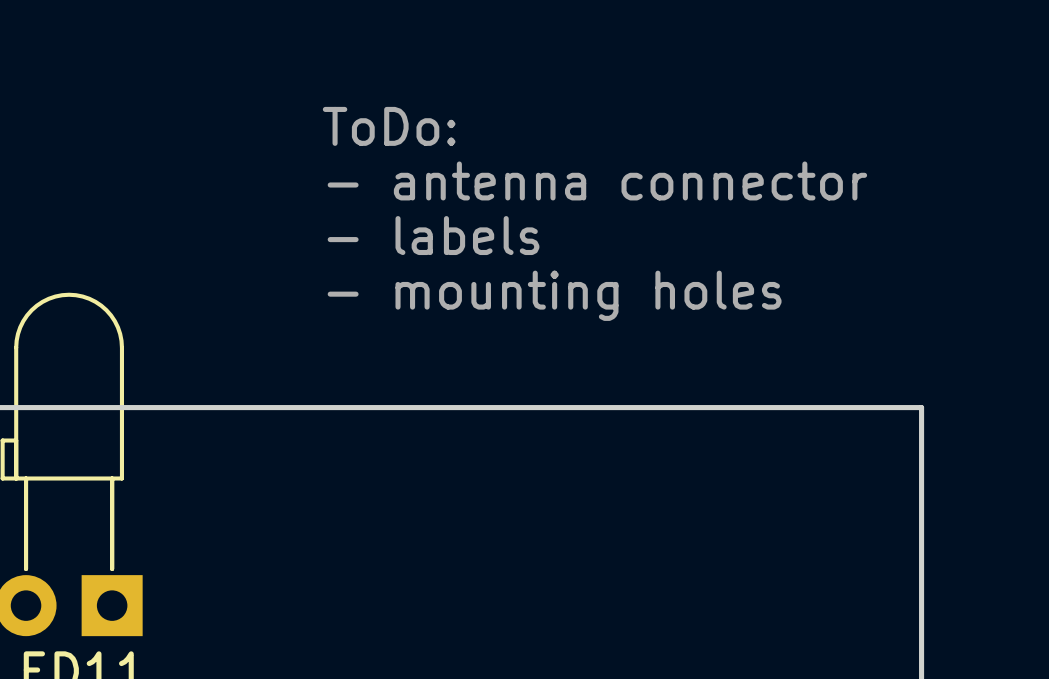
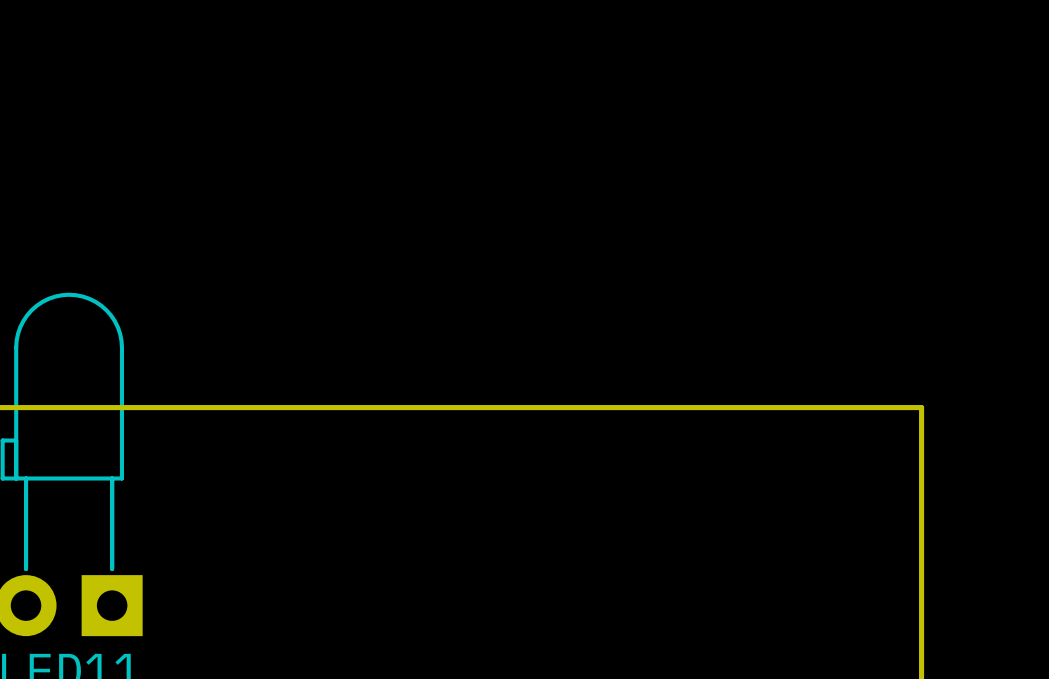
text: ToDo: (389, 126) -> none
text: - antenna connector (597, 180) -> none
text: - labels (433, 235) -> none
text: - mounting holes (554, 295) -> none

